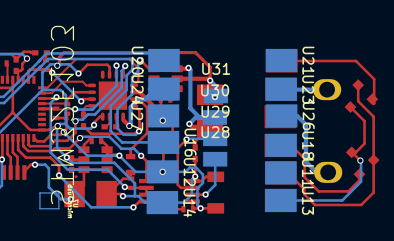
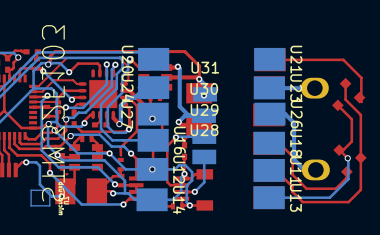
part footprint: [125, 153, 136, 176] -> [117, 157, 124, 172]

